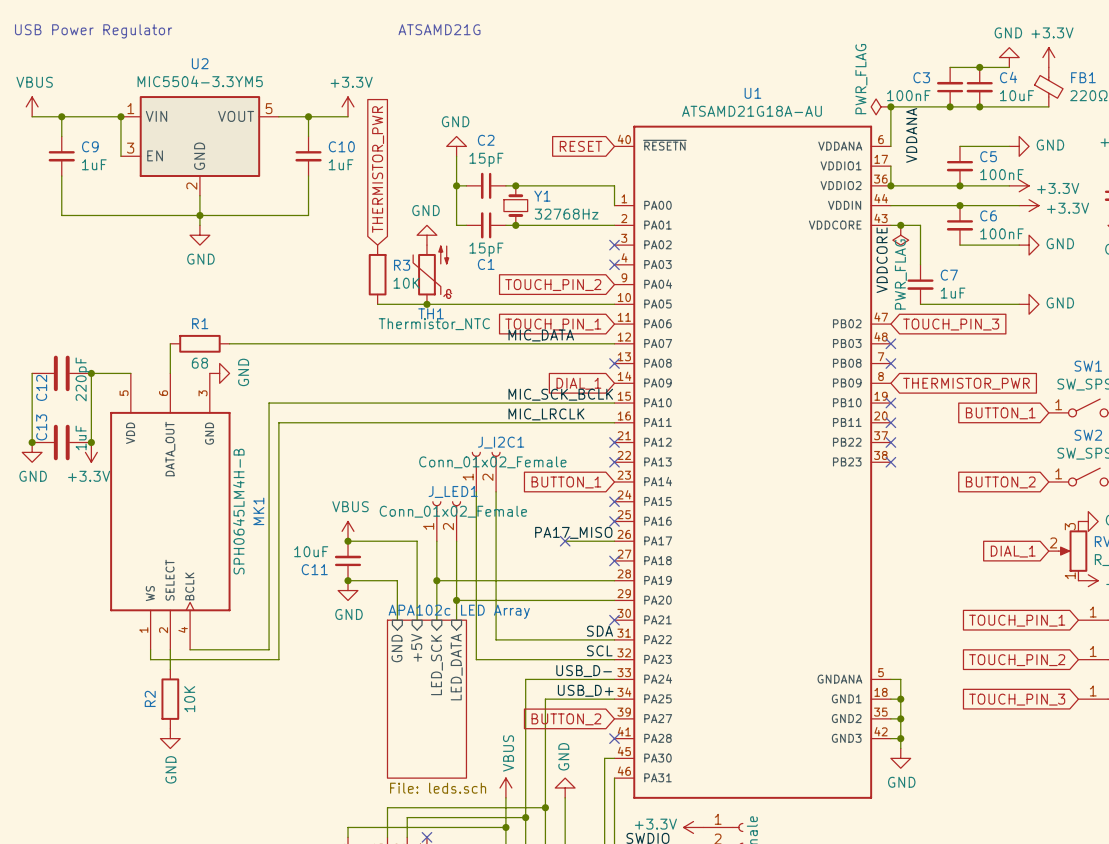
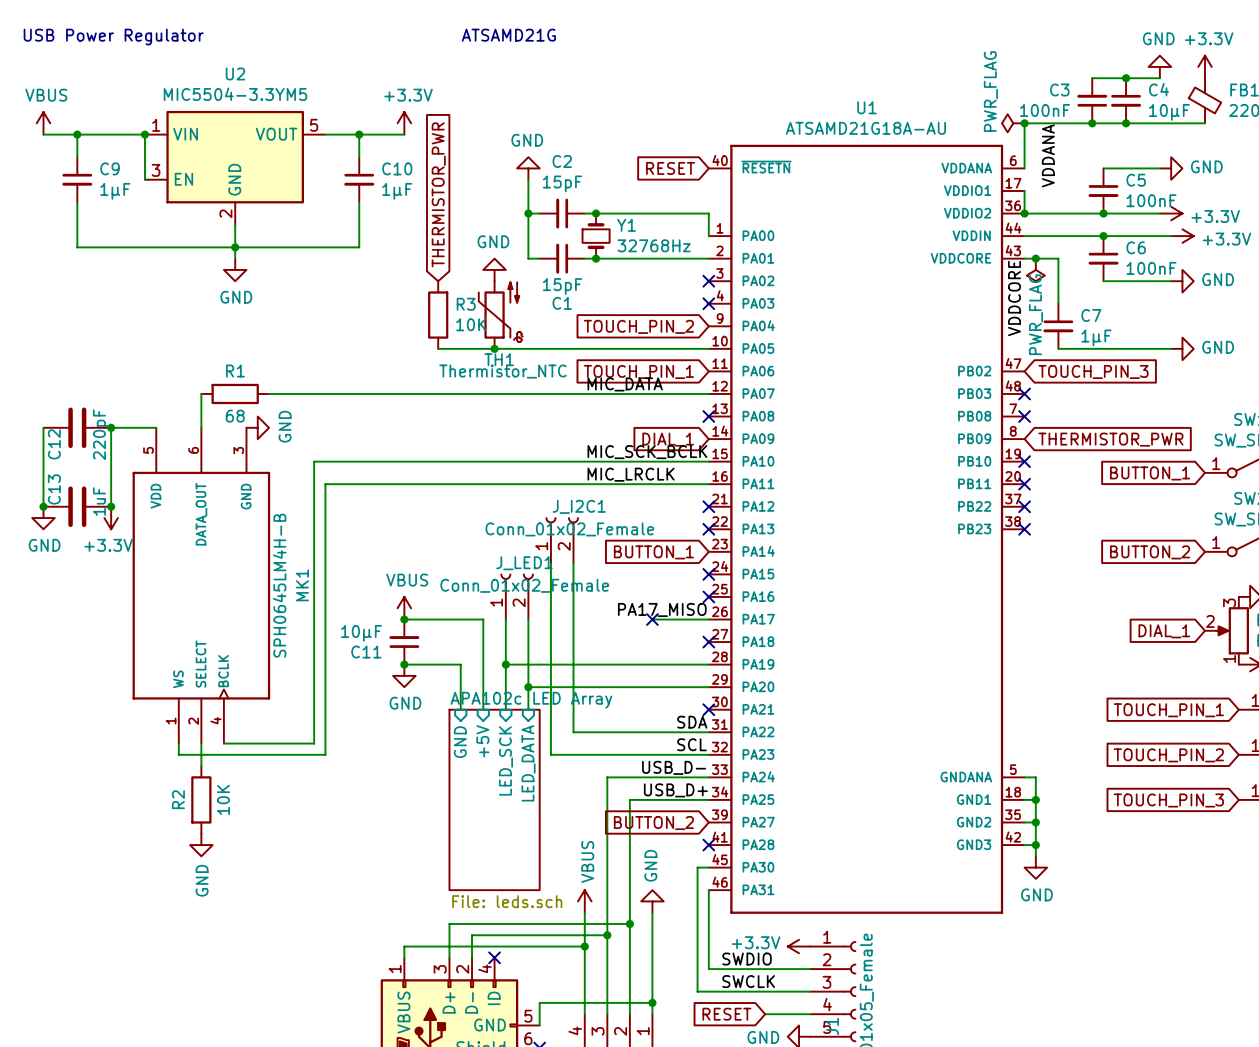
C4 value: 10uF (1017, 95) -> 10µF (1169, 112)
C9 value: 1uF (94, 164) -> 1µF (115, 191)
C10 value: 1uF (341, 164) -> 1µF (397, 191)
C7 value: 1uF (953, 293) -> 1µF (1096, 337)
C11 value: 10uF (311, 551) -> 10µF (361, 633)

